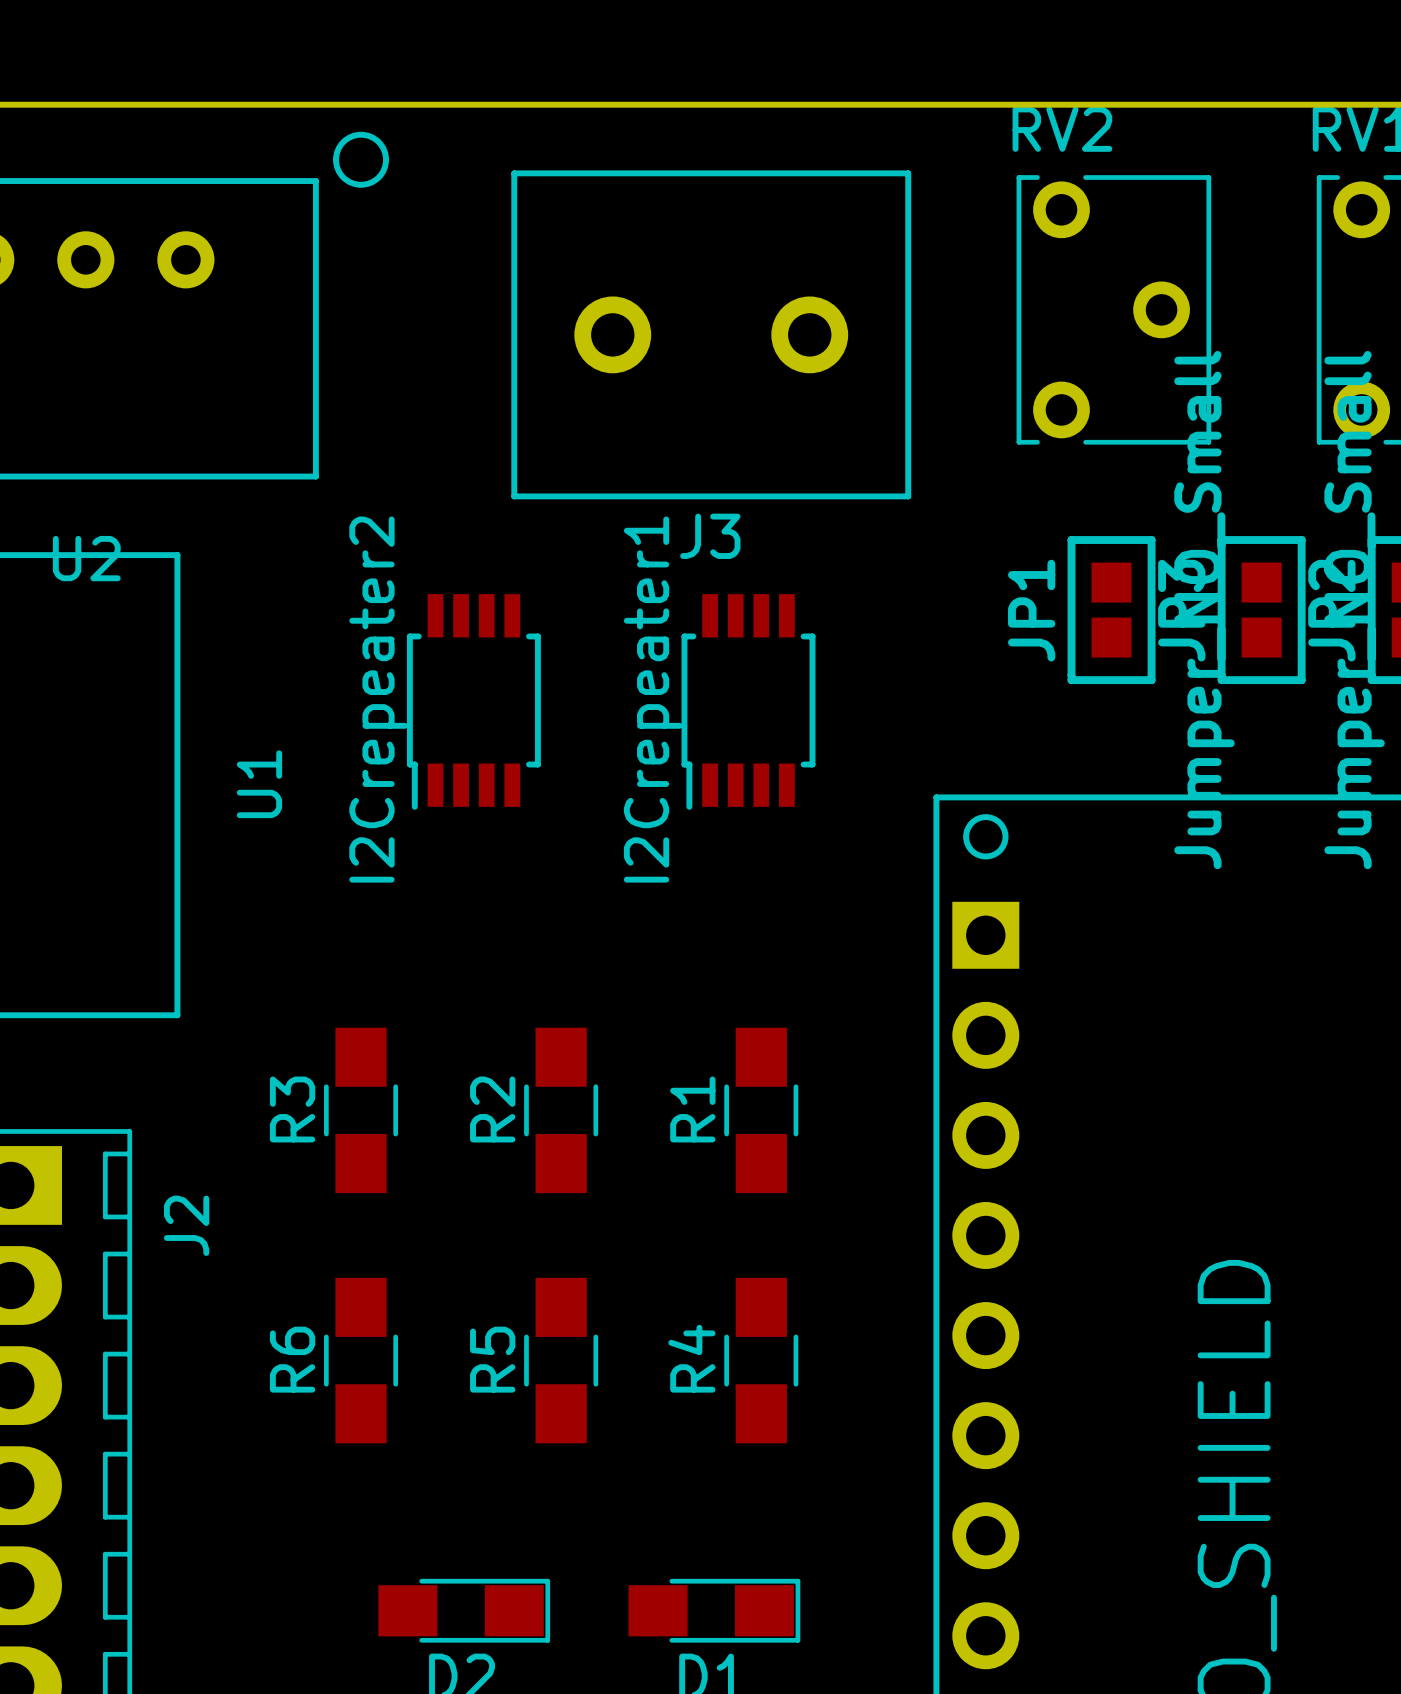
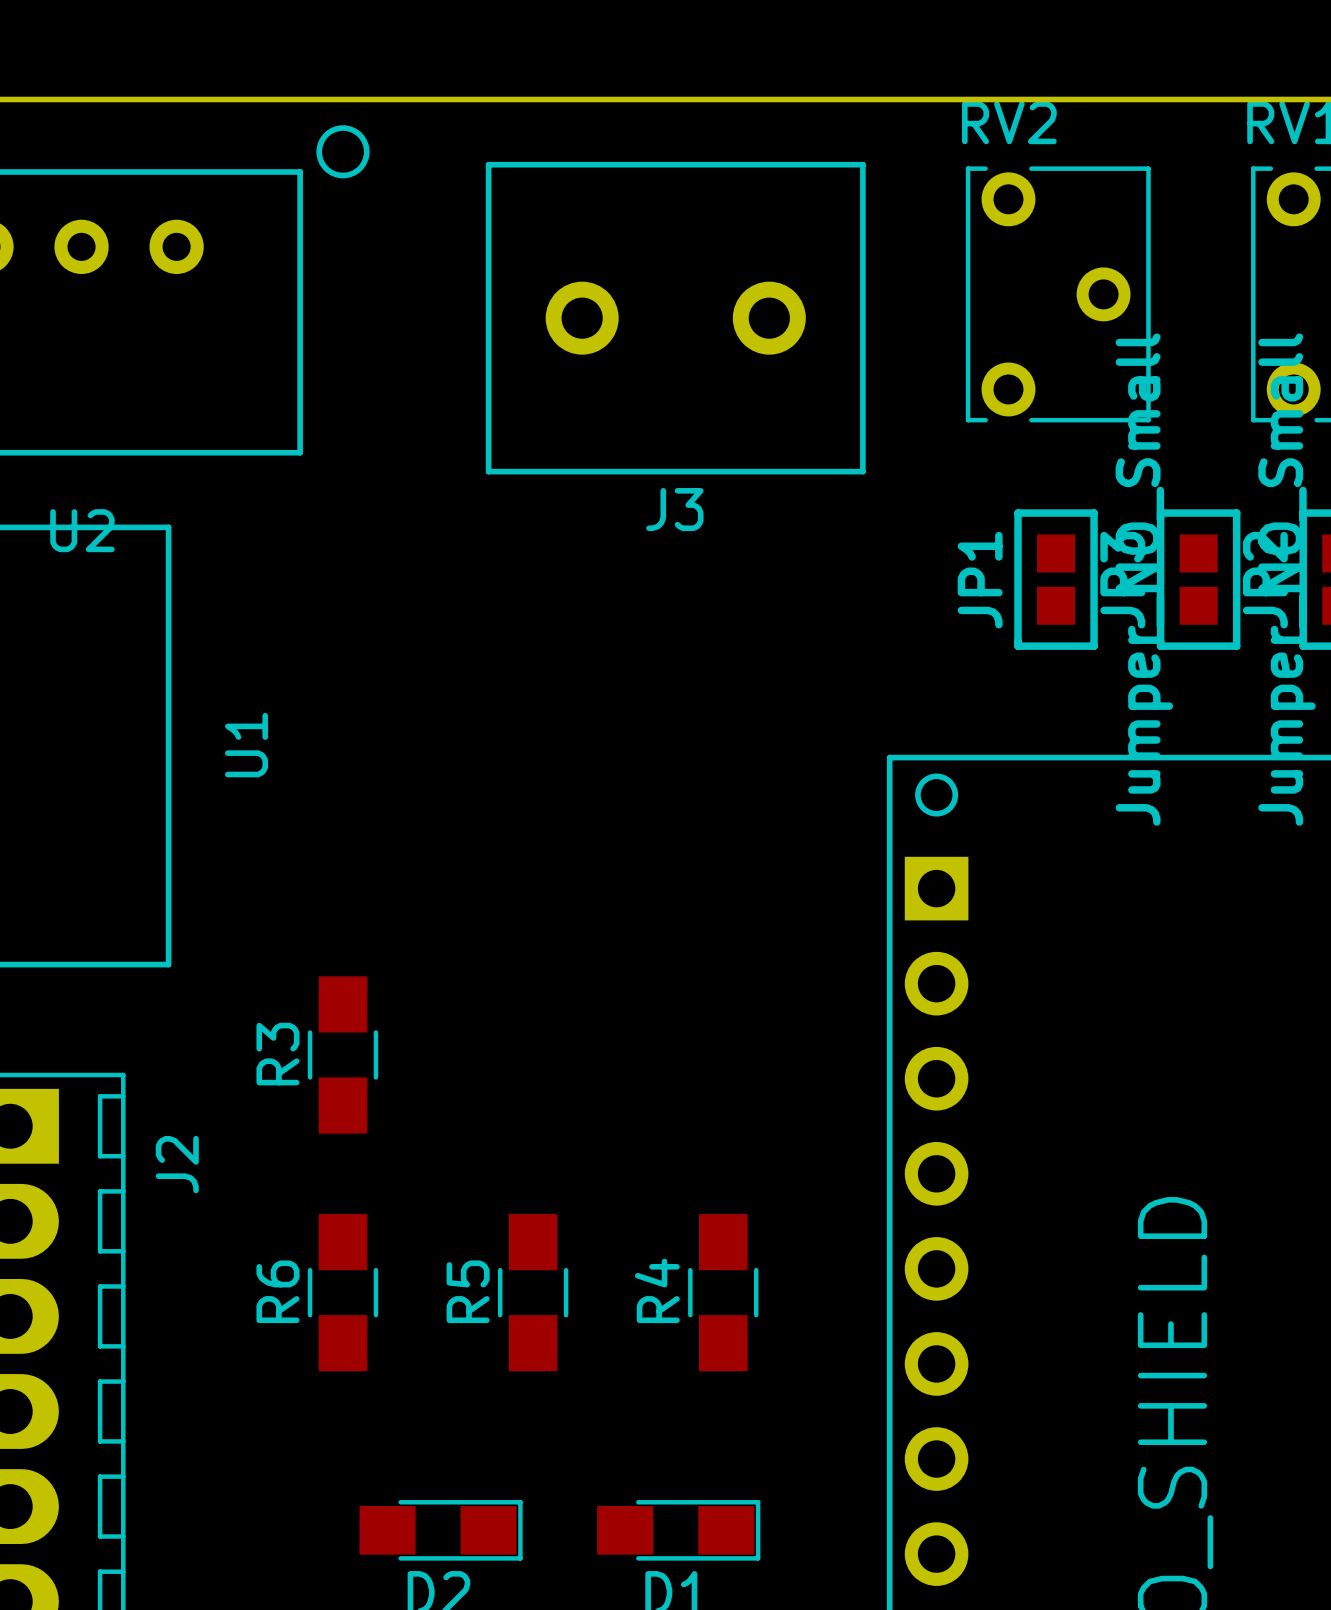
I2Crepeater2: (473, 701) -> none
I2Crepeater1: (748, 701) -> none
R2: (561, 1110) -> none
R1: (761, 1110) -> none

